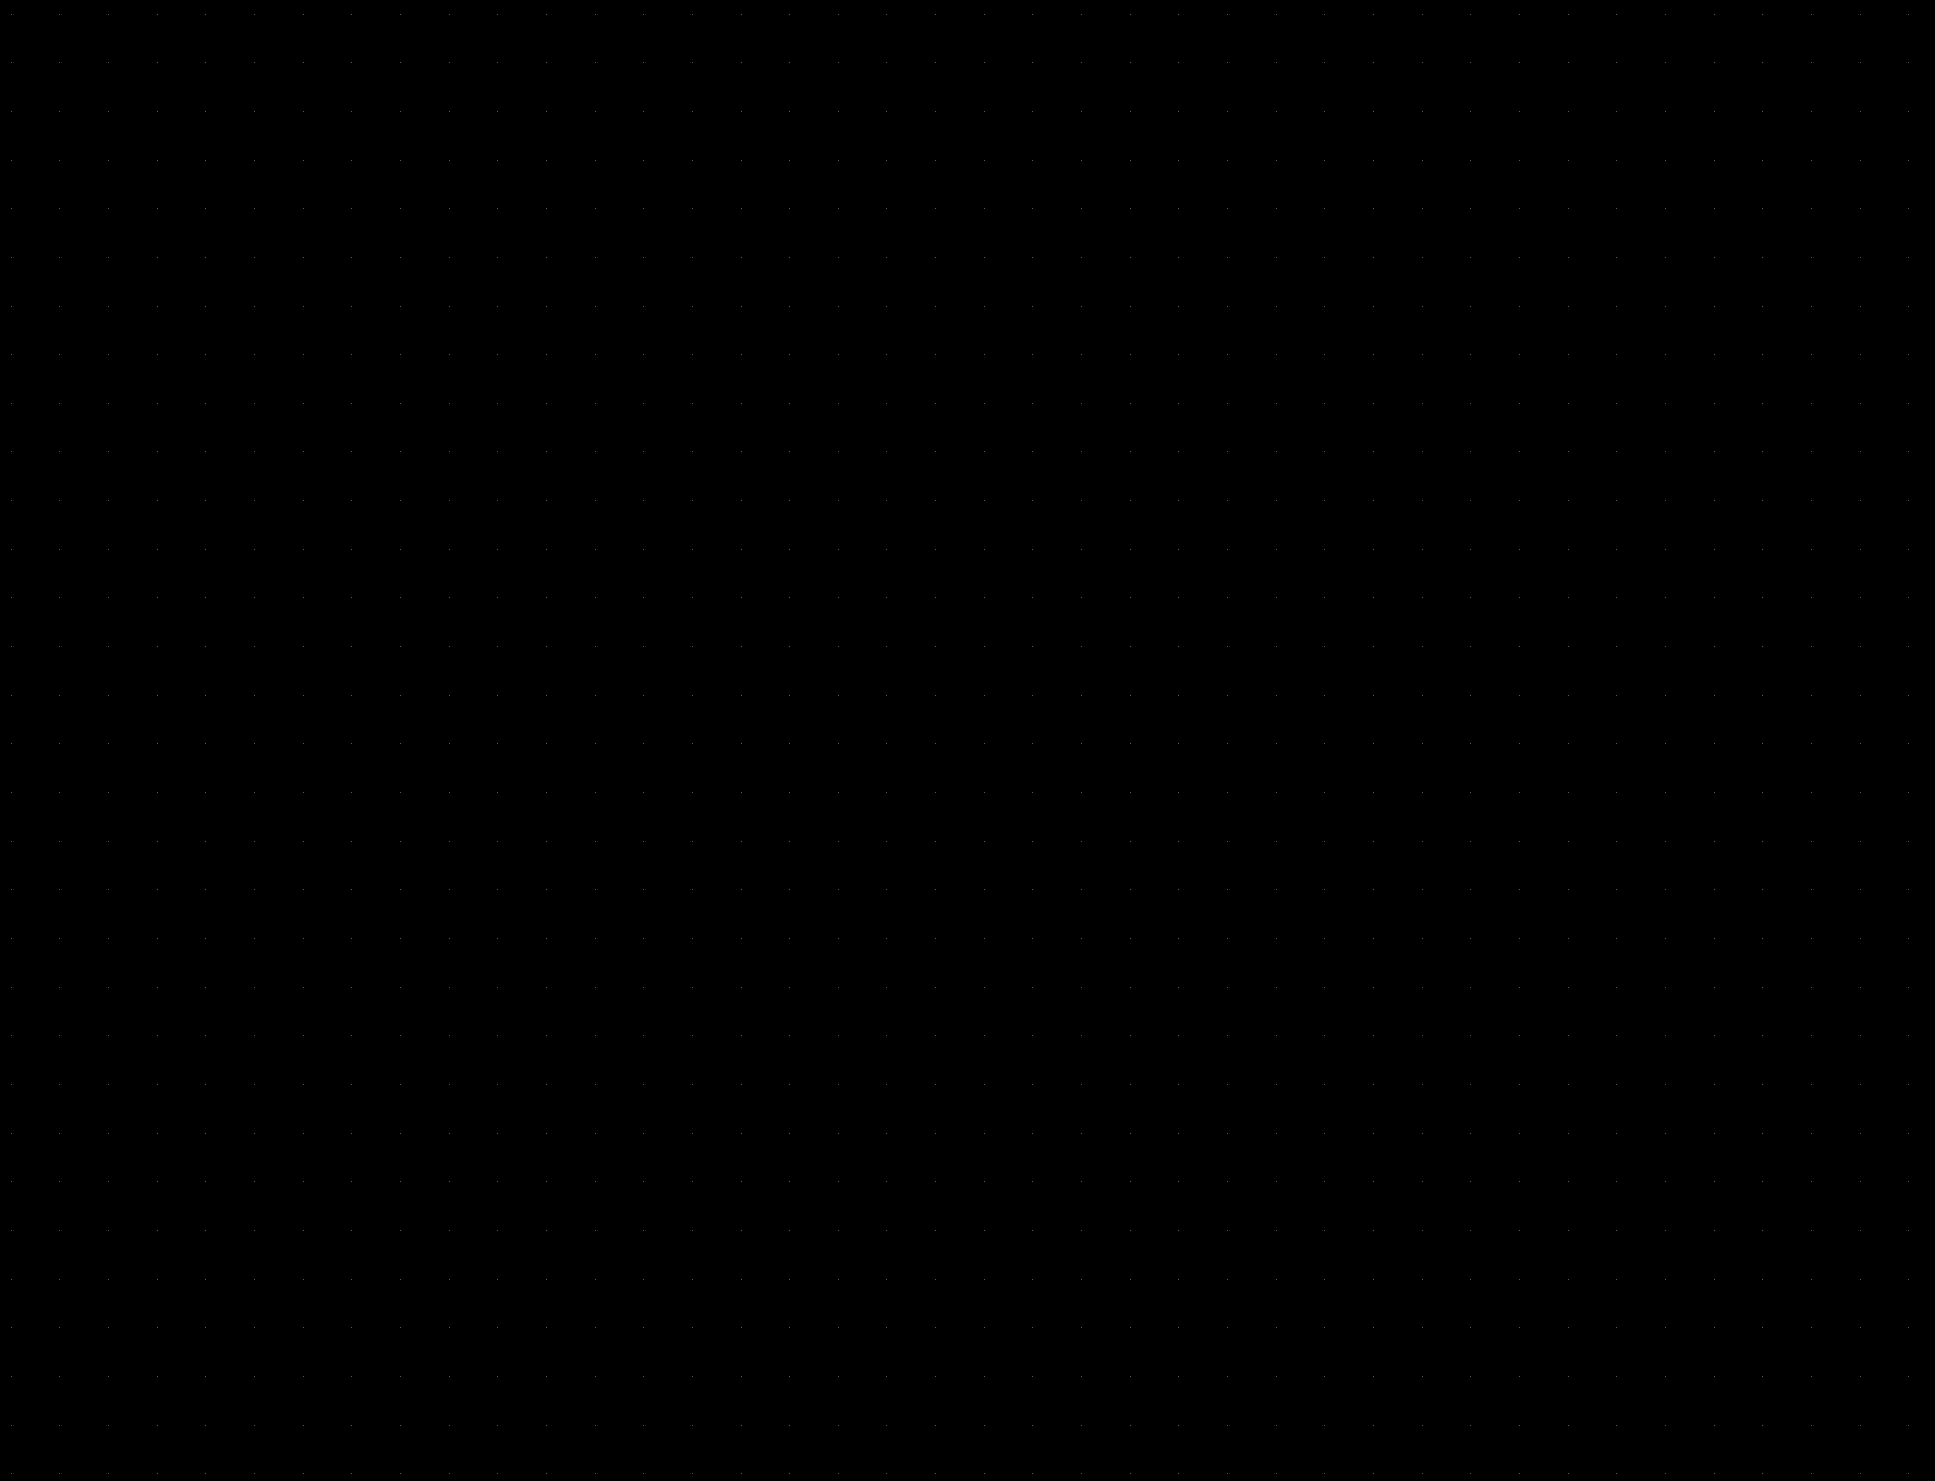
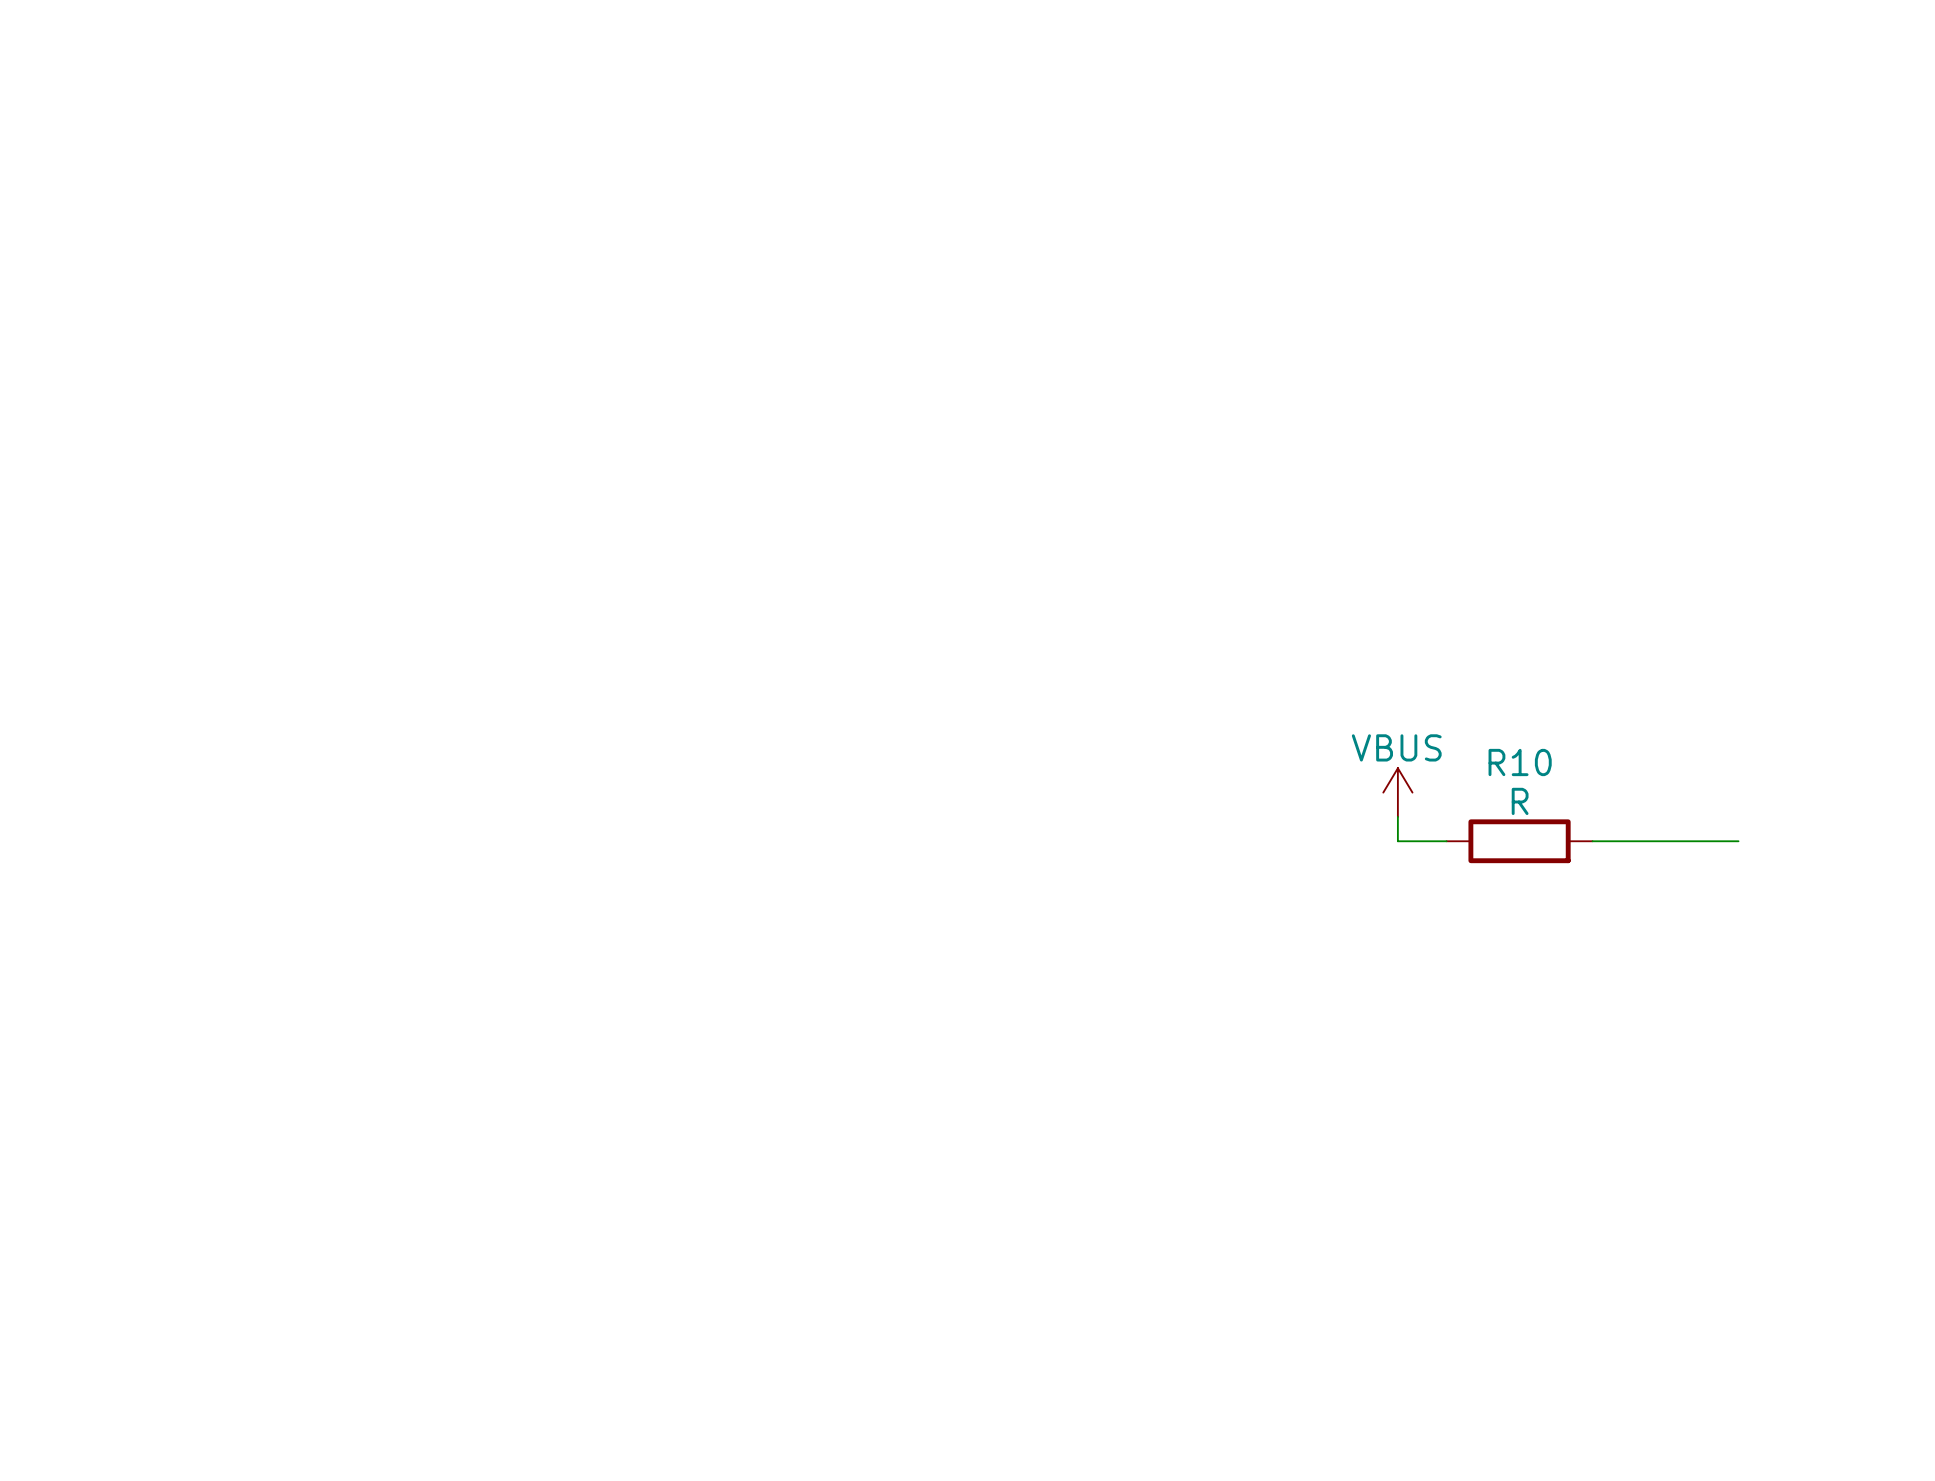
power symbol: none -> VBUS (1397, 792)
wire: none -> (1397, 816) (1397, 841) (1446, 841)
R10: none -> R (1519, 841)
wire: none -> (1592, 841) (1738, 841)

